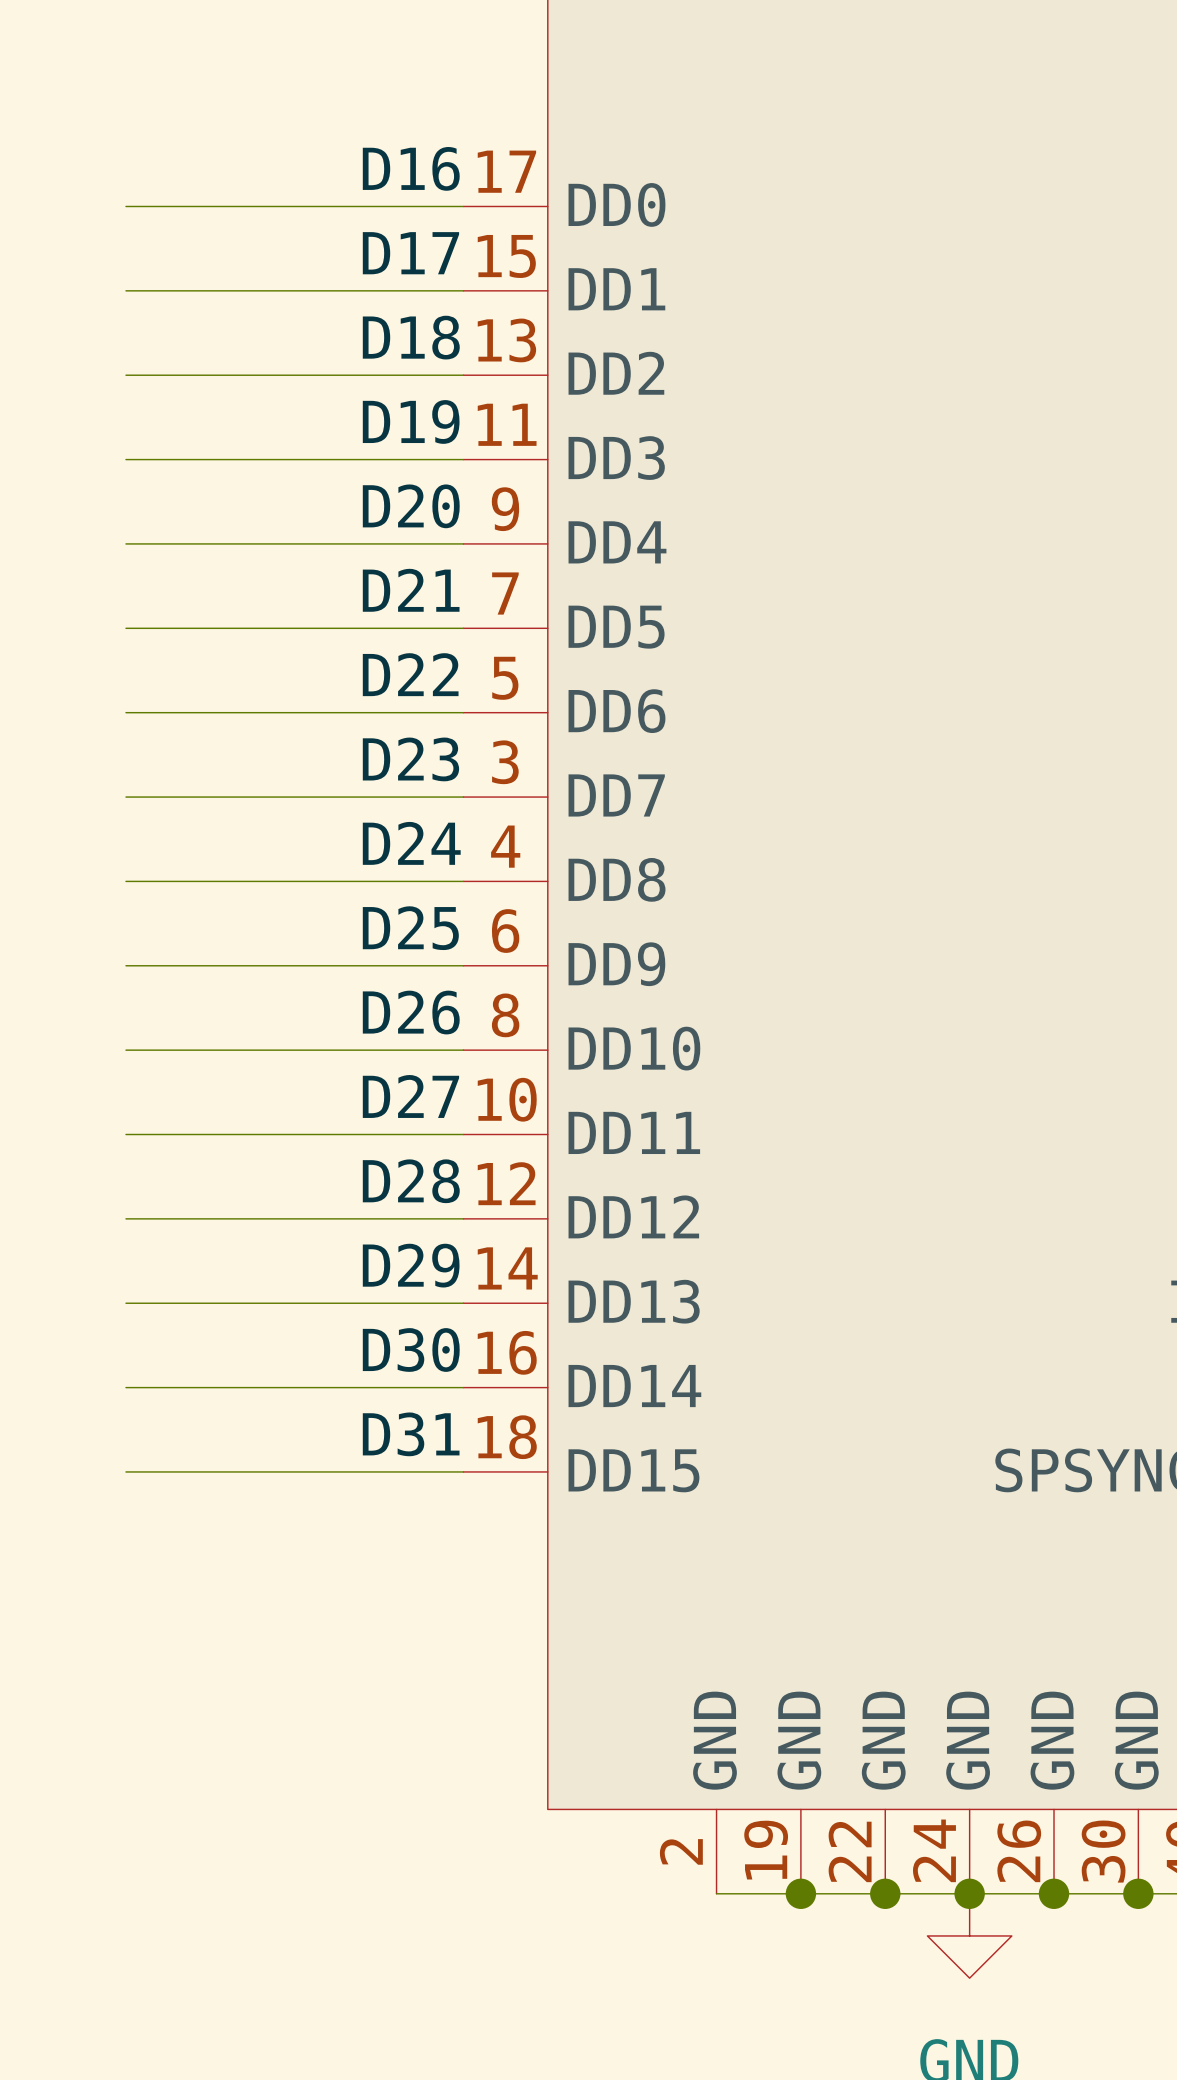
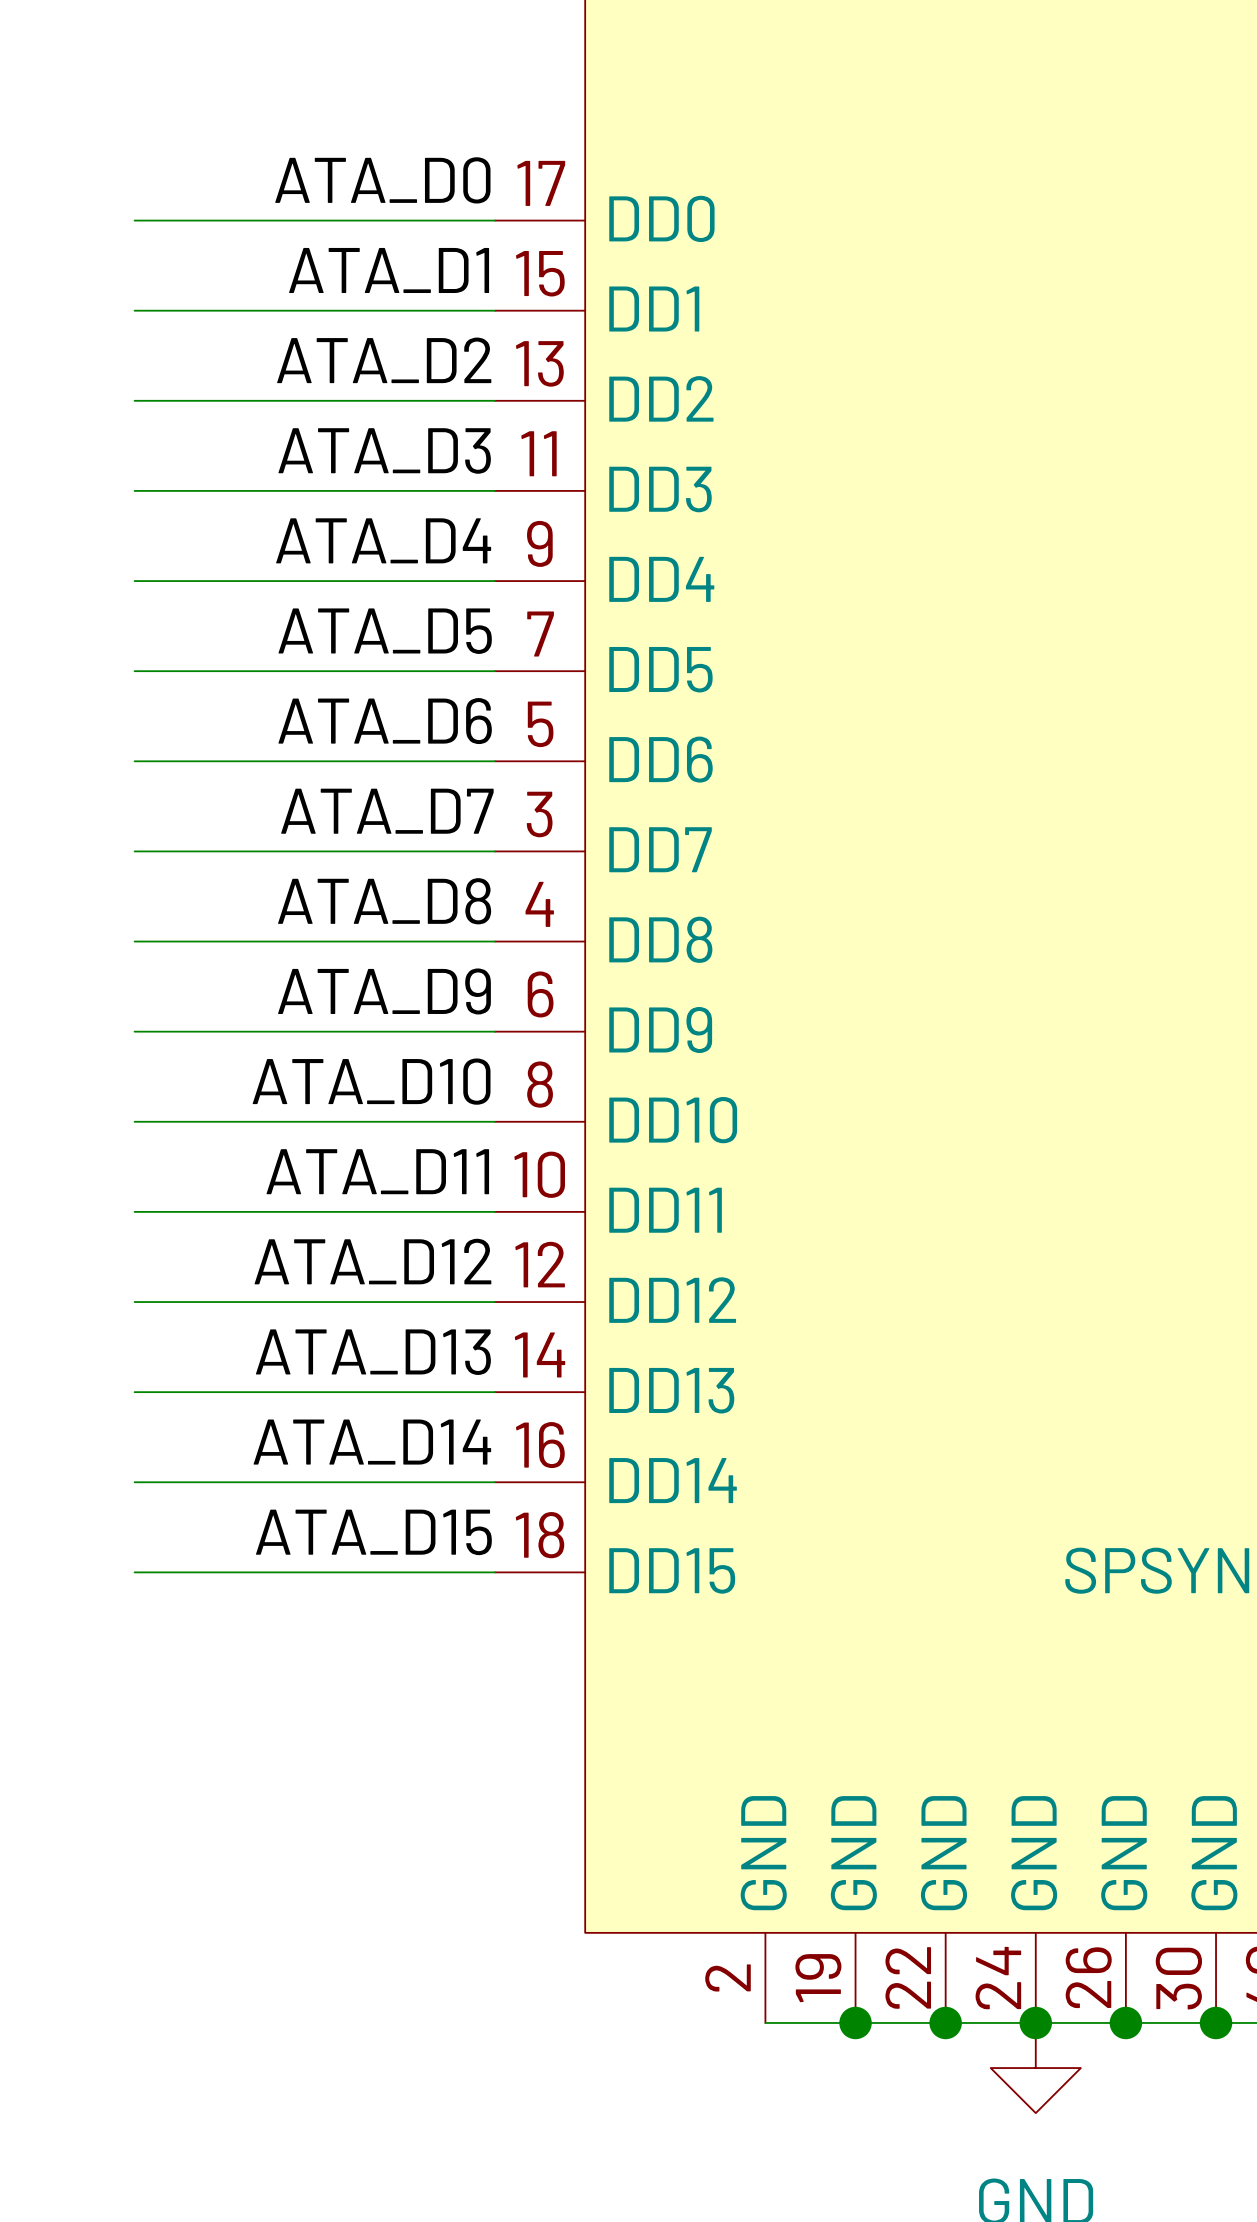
label: D16 (411, 168) -> ATA_D0 (382, 180)
label: D17 (410, 253) -> ATA_D1 (389, 270)
label: D18 (411, 337) -> ATA_D2 (384, 360)
label: D19 (411, 421) -> ATA_D3 (384, 450)
label: D20 (411, 506) -> ATA_D4 (383, 540)
label: D21 (411, 590) -> ATA_D5 (385, 631)
label: D22 (410, 674) -> ATA_D6 (385, 721)
label: D23 (410, 759) -> ATA_D7 (387, 811)
label: D24 (411, 843) -> ATA_D8 (384, 901)
label: D25 (410, 928) -> ATA_D9 (384, 991)
label: D26 (411, 1012) -> ATA_D10 (371, 1081)
label: D27 (410, 1096) -> ATA_D11 (377, 1171)
label: D28 (411, 1181) -> ATA_D12 (372, 1261)
label: D29 (411, 1265) -> ATA_D13 (373, 1352)
label: D30 (411, 1349) -> ATA_D14 (372, 1442)
label: D31 (411, 1434) -> ATA_D15 (373, 1532)

